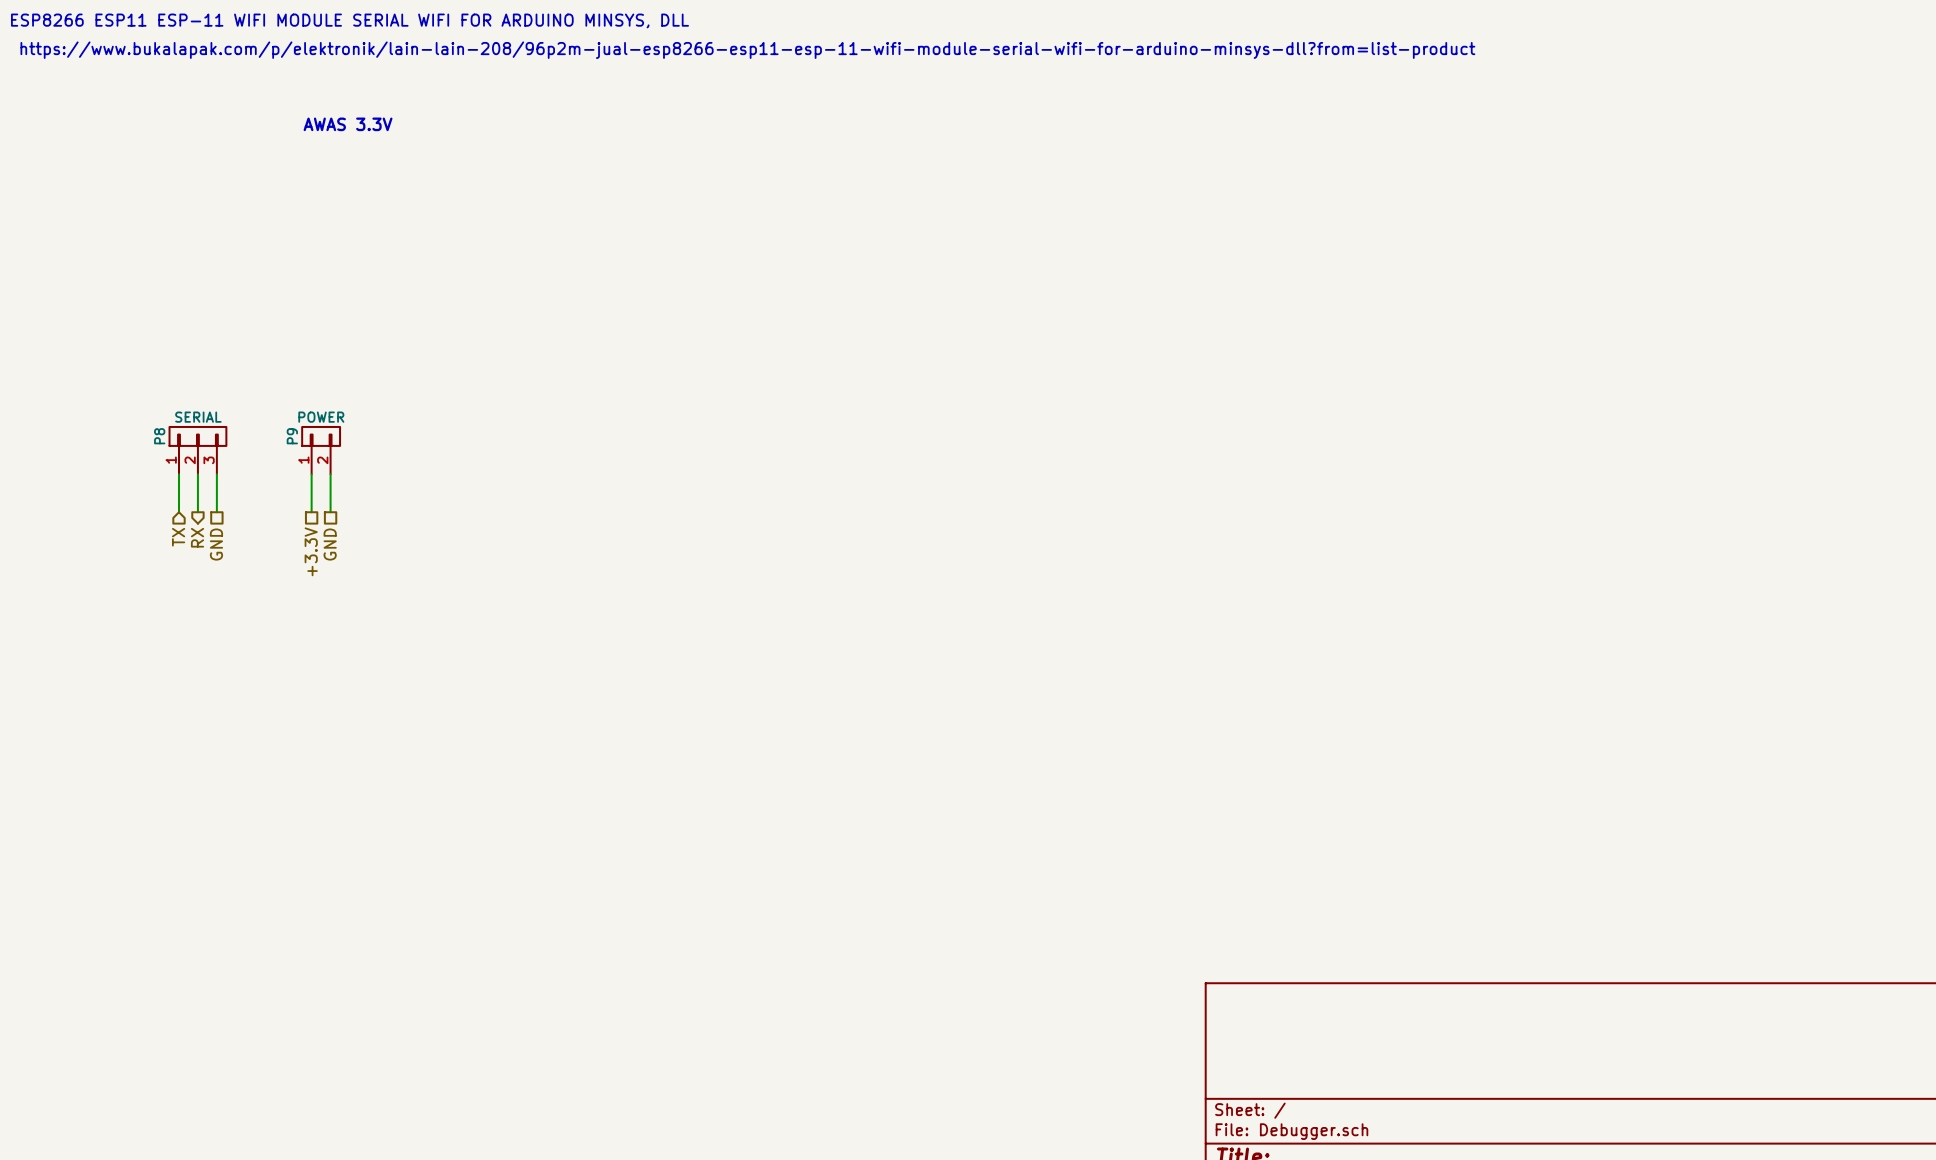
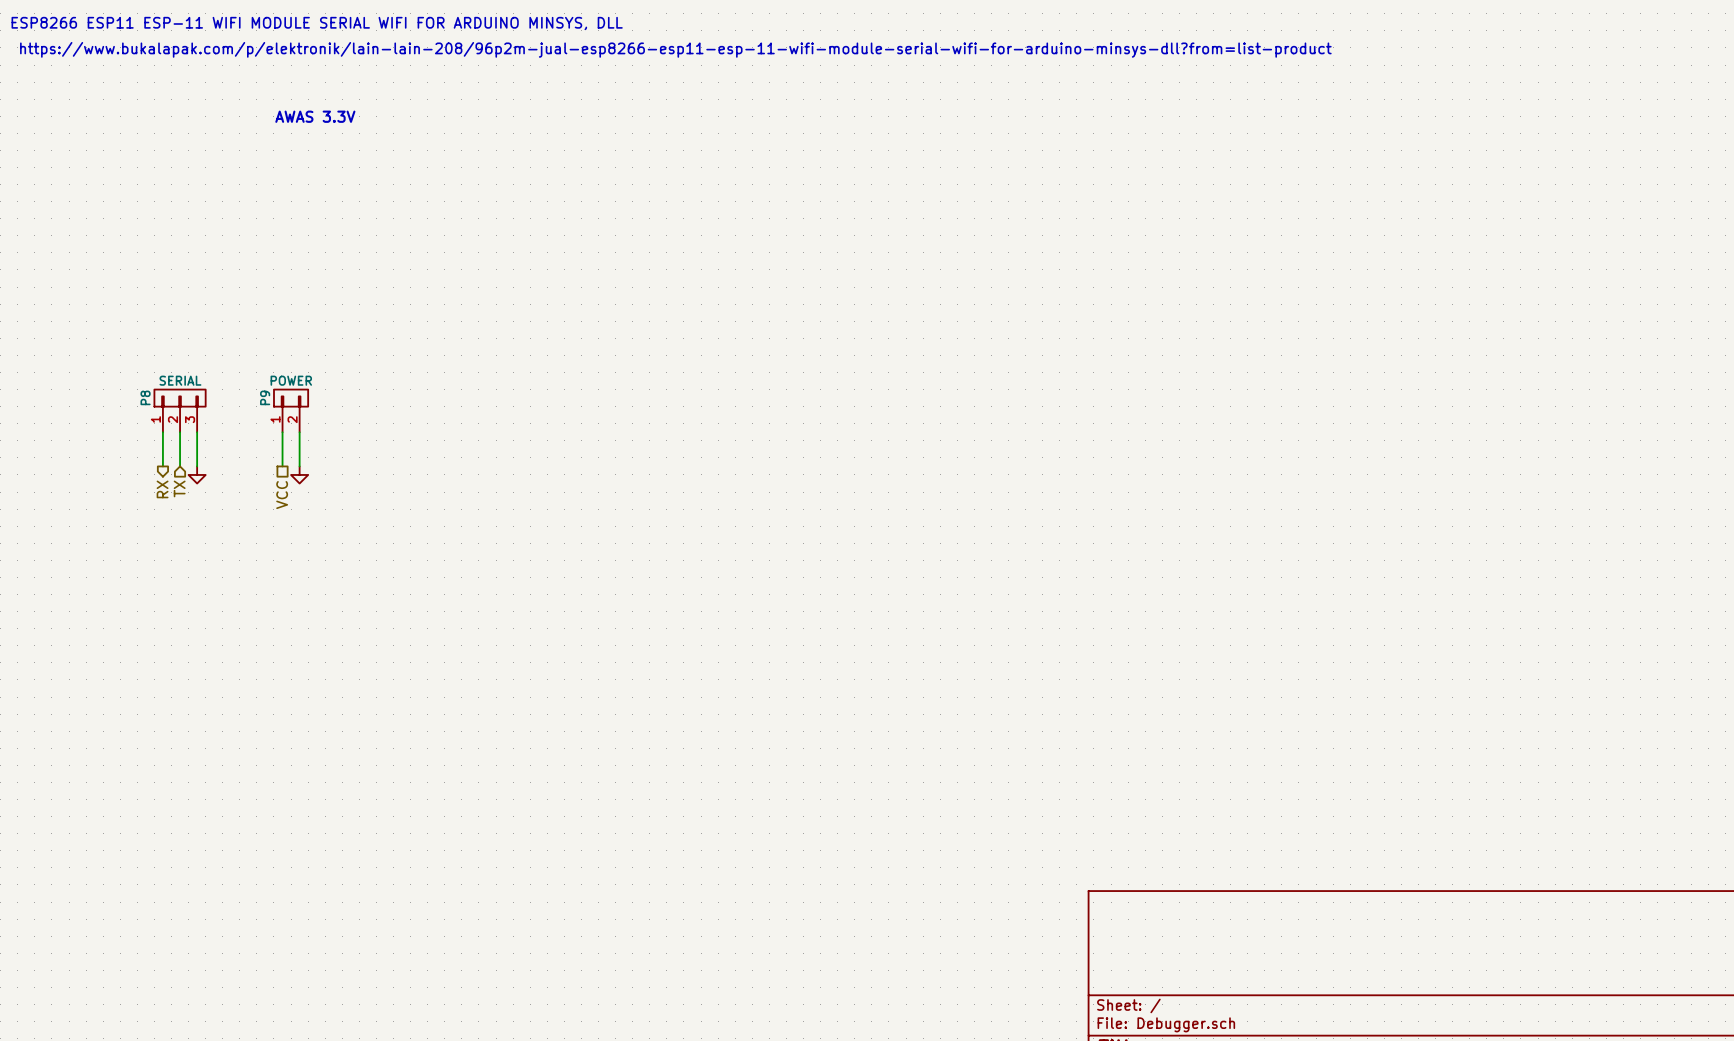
power symbol: none -> (197, 474)
power symbol: none -> (299, 474)
hierarchical label shape: input (178, 537) -> output (162, 489)
hierarchical label: TX (178, 537) -> RX (162, 489)
hierarchical label shape: output (197, 537) -> input (179, 488)
hierarchical label: RX (197, 537) -> TX (179, 488)
hierarchical label: GND (216, 544) -> none
hierarchical label: GND (330, 544) -> none
hierarchical label: +3.3V (311, 551) -> VCC (282, 495)

